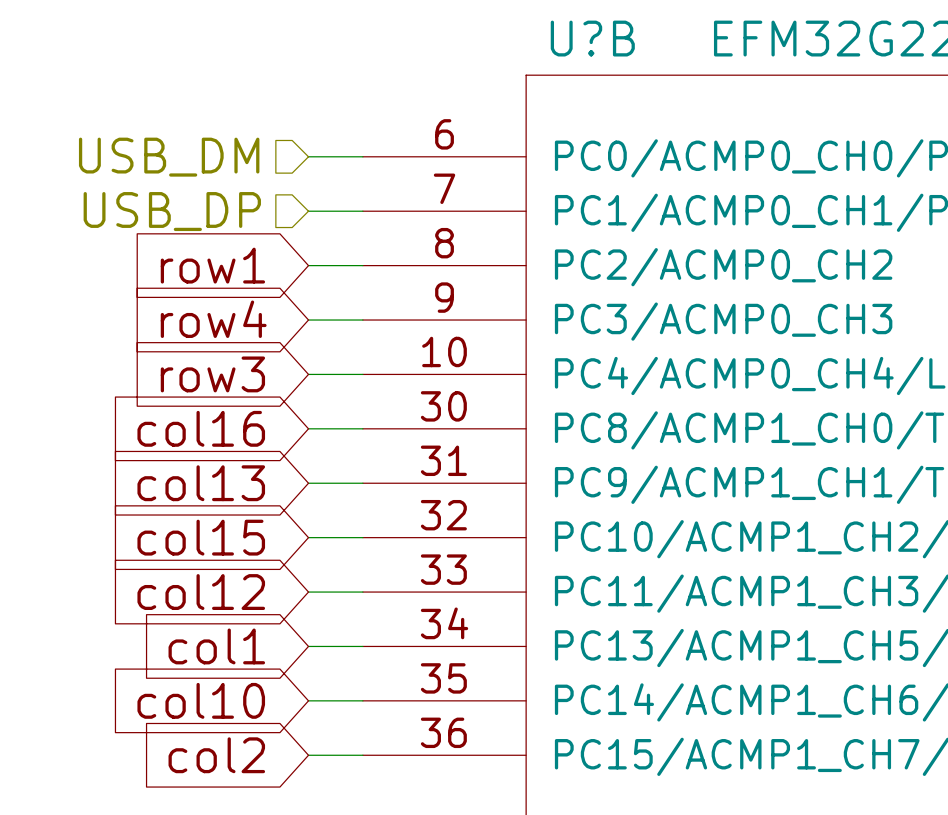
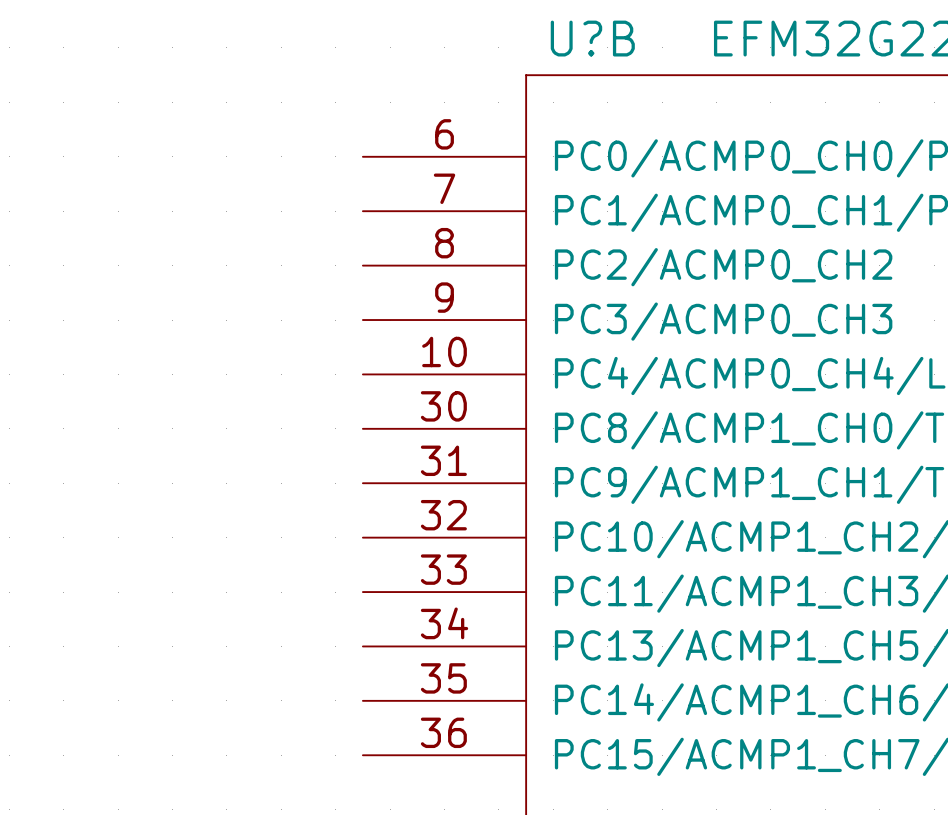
wire: (308, 156) (362, 156) -> none
hierarchical label: USB_DM (169, 157) -> none
hierarchical label: USB_DP (172, 211) -> none
wire: (308, 211) (362, 211) -> none
global label: row1 (212, 265) -> none
wire: (308, 265) (362, 265) -> none
global label: row4 (213, 319) -> none
wire: (308, 320) (362, 320) -> none
global label: row3 (212, 374) -> none
wire: (308, 374) (362, 374) -> none
global label: col16 (201, 428) -> none
wire: (308, 428) (362, 428) -> none
global label: col13 (201, 483) -> none
wire: (308, 483) (362, 483) -> none
global label: col15 (201, 537) -> none
wire: (308, 537) (362, 537) -> none
global label: col12 (201, 592) -> none
wire: (308, 592) (362, 592) -> none
global label: col1 (216, 646) -> none
wire: (308, 646) (362, 646) -> none
global label: col10 (201, 700) -> none
wire: (308, 700) (362, 700) -> none
global label: col2 (216, 755) -> none
wire: (308, 755) (362, 755) -> none

